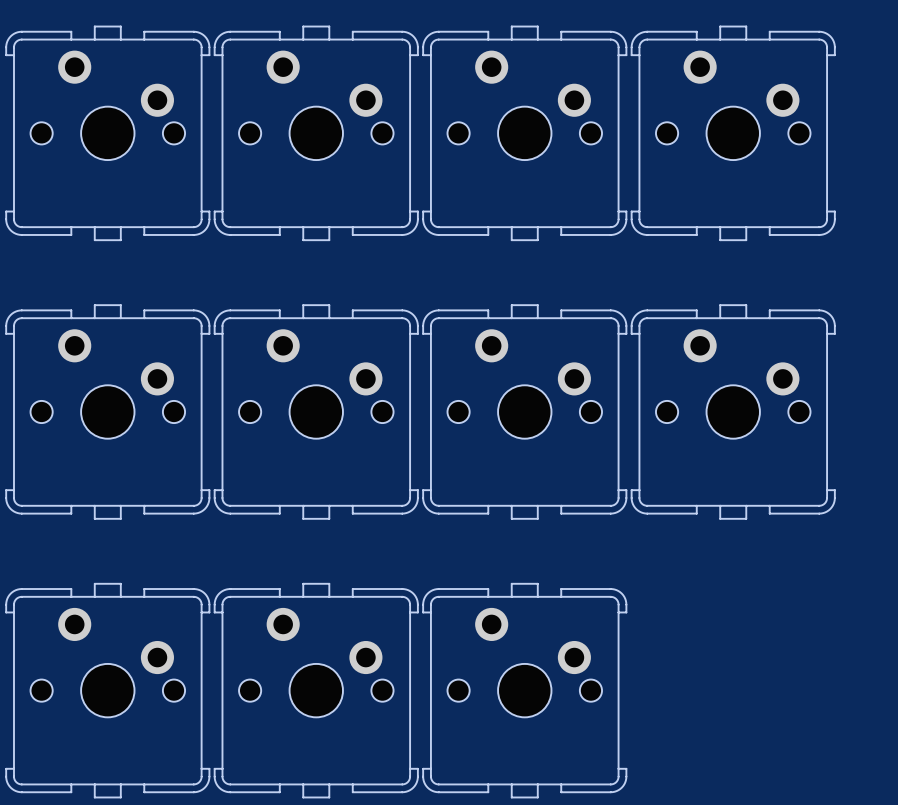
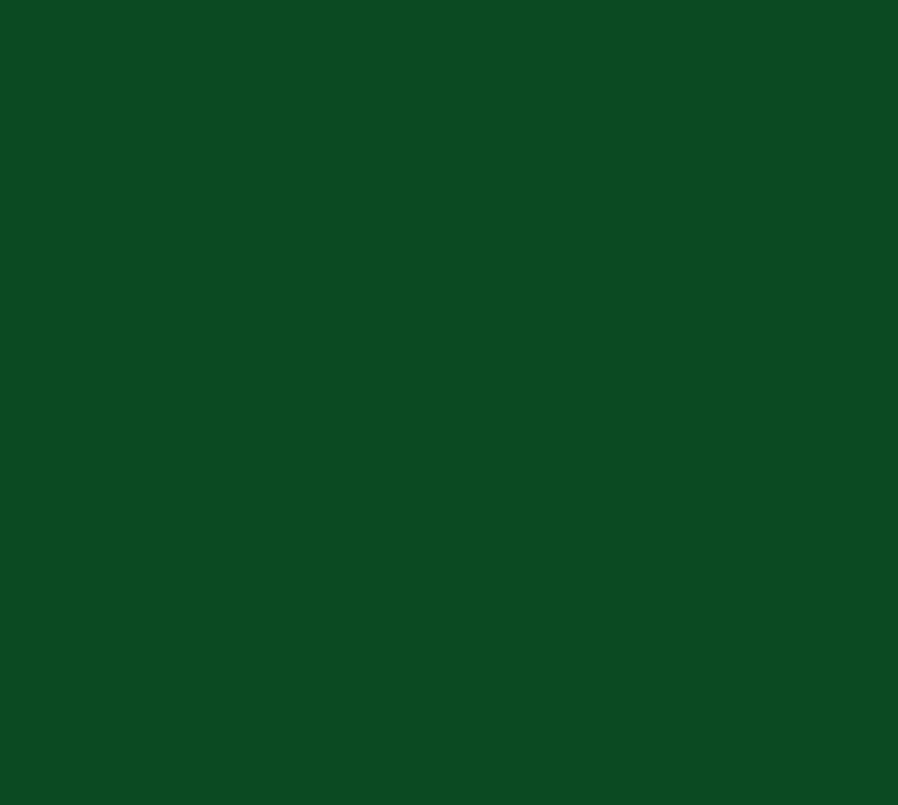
part: (107, 133) -> none
part: (316, 133) -> none
part: (524, 133) -> none
part: (733, 133) -> none
part: (107, 411) -> none
part: (316, 411) -> none
part: (524, 411) -> none
part: (733, 411) -> none
part: (107, 690) -> none
part: (316, 690) -> none
part: (524, 690) -> none

